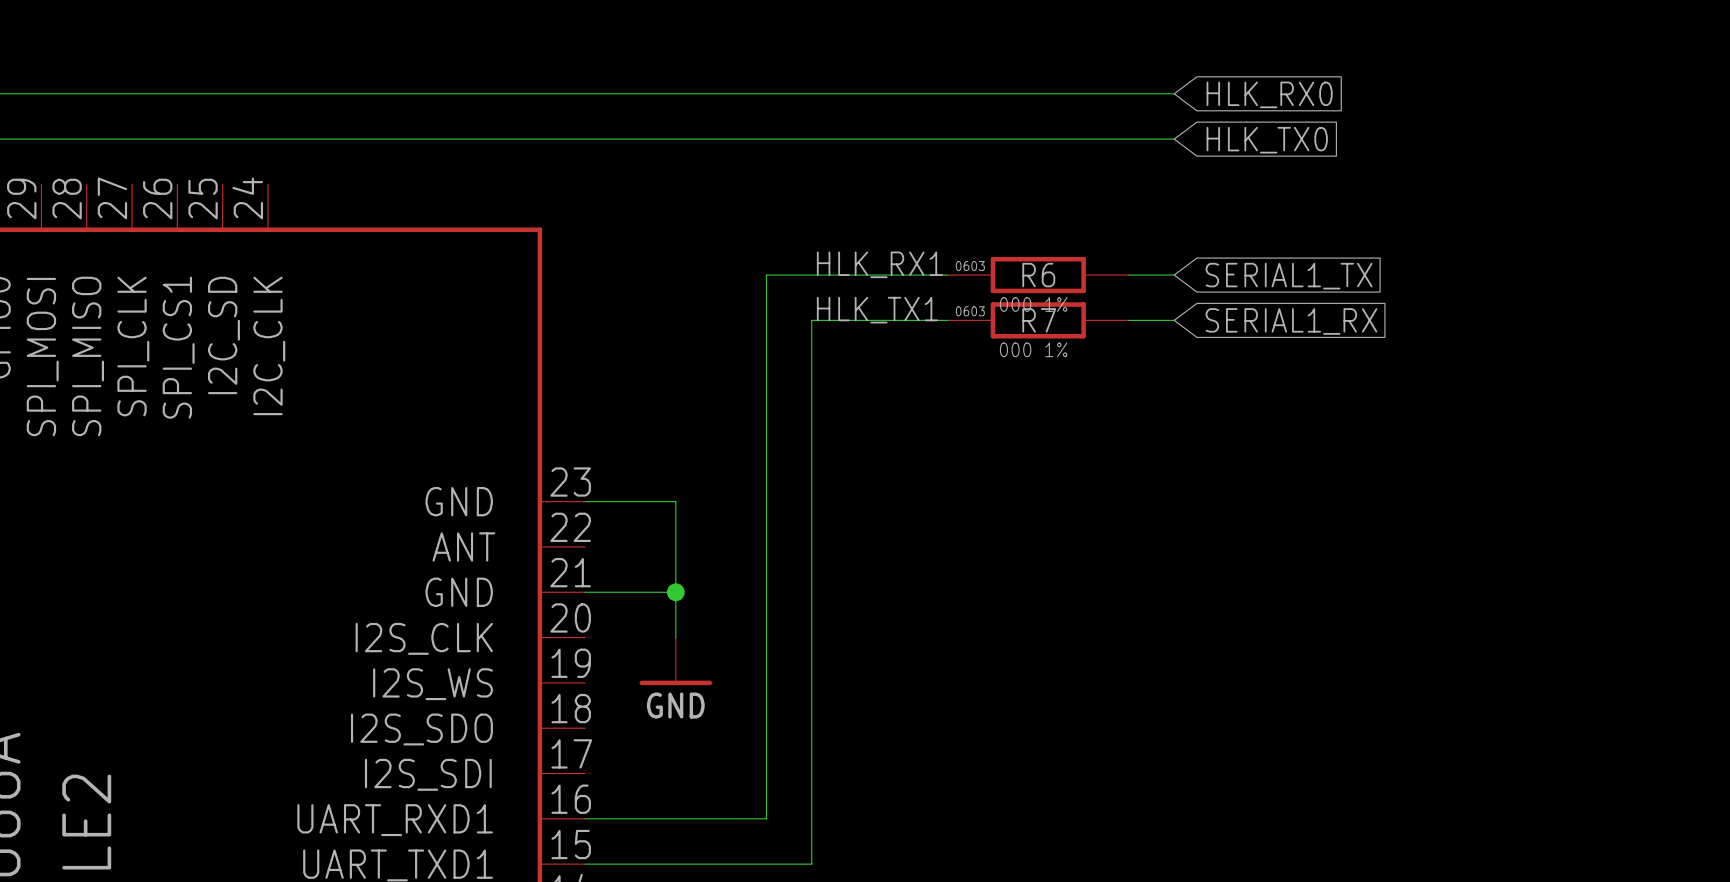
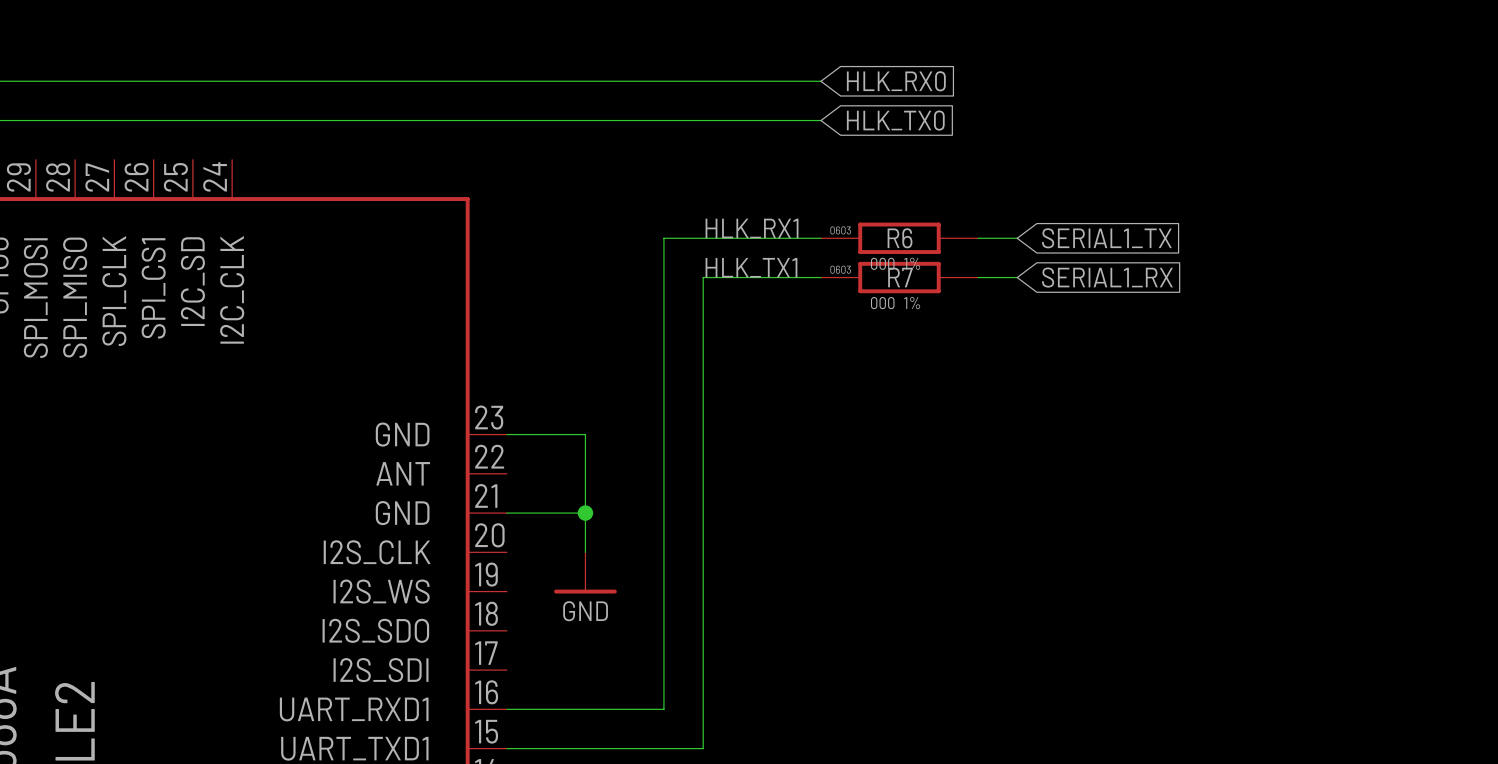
wire: (947, 93) (1174, 93) -> none
global label position: HLK_RX0 (1269, 94) -> HLK_RX0 (896, 81)
wire: (947, 139) (1174, 139) -> none
global label position: HLK_TX0 (1267, 140) -> HLK_TX0 (895, 120)

